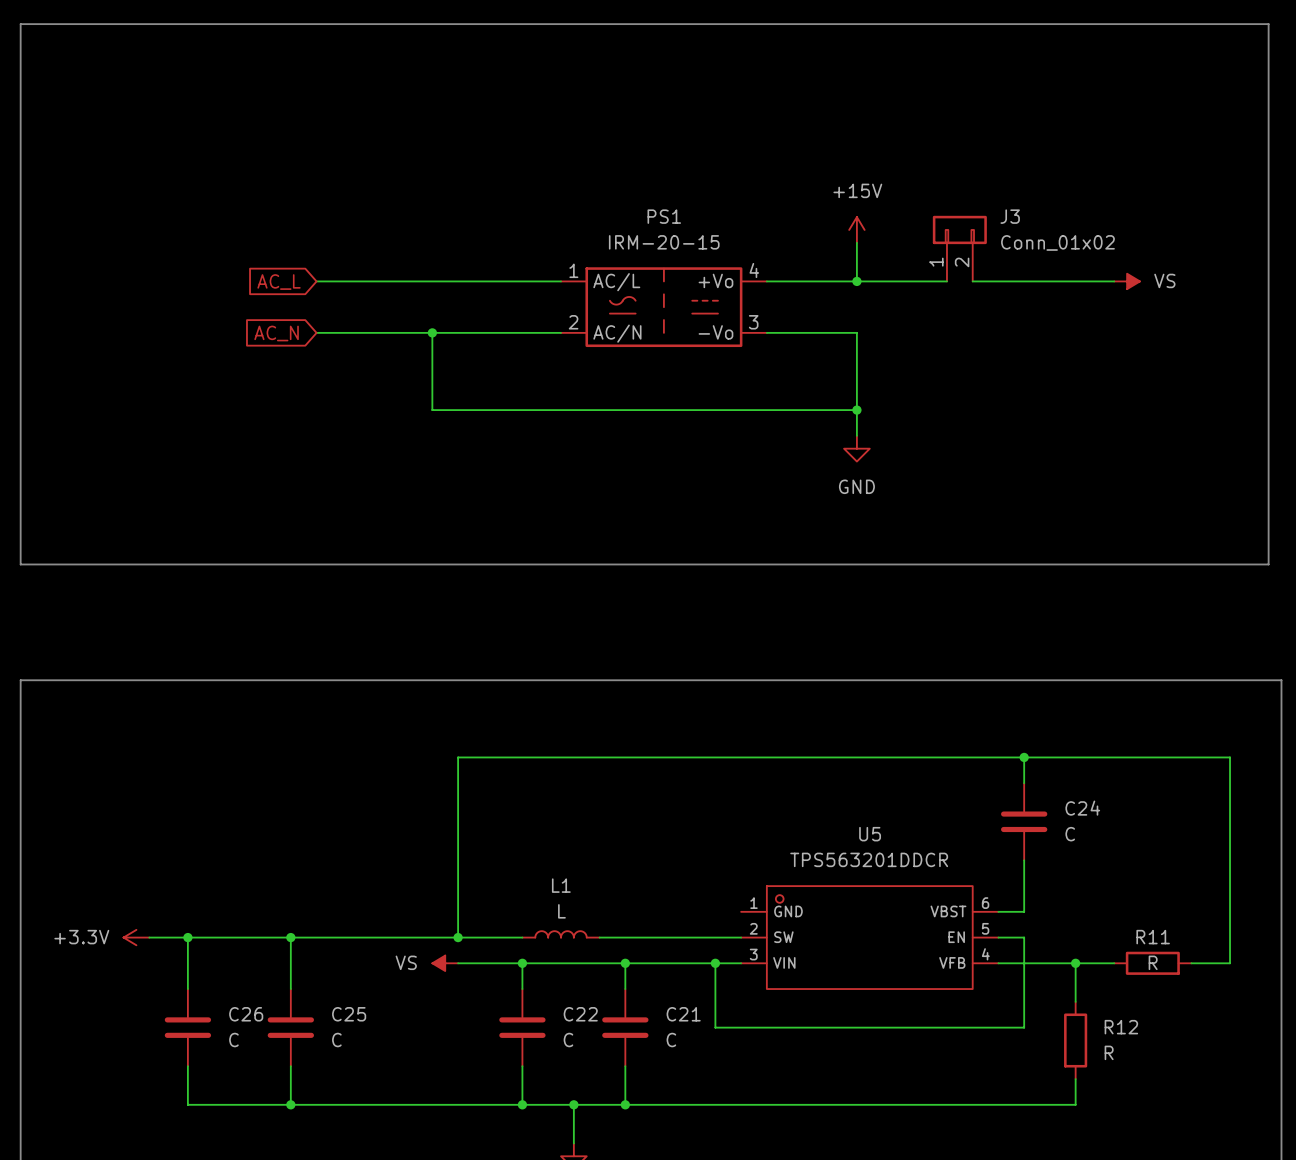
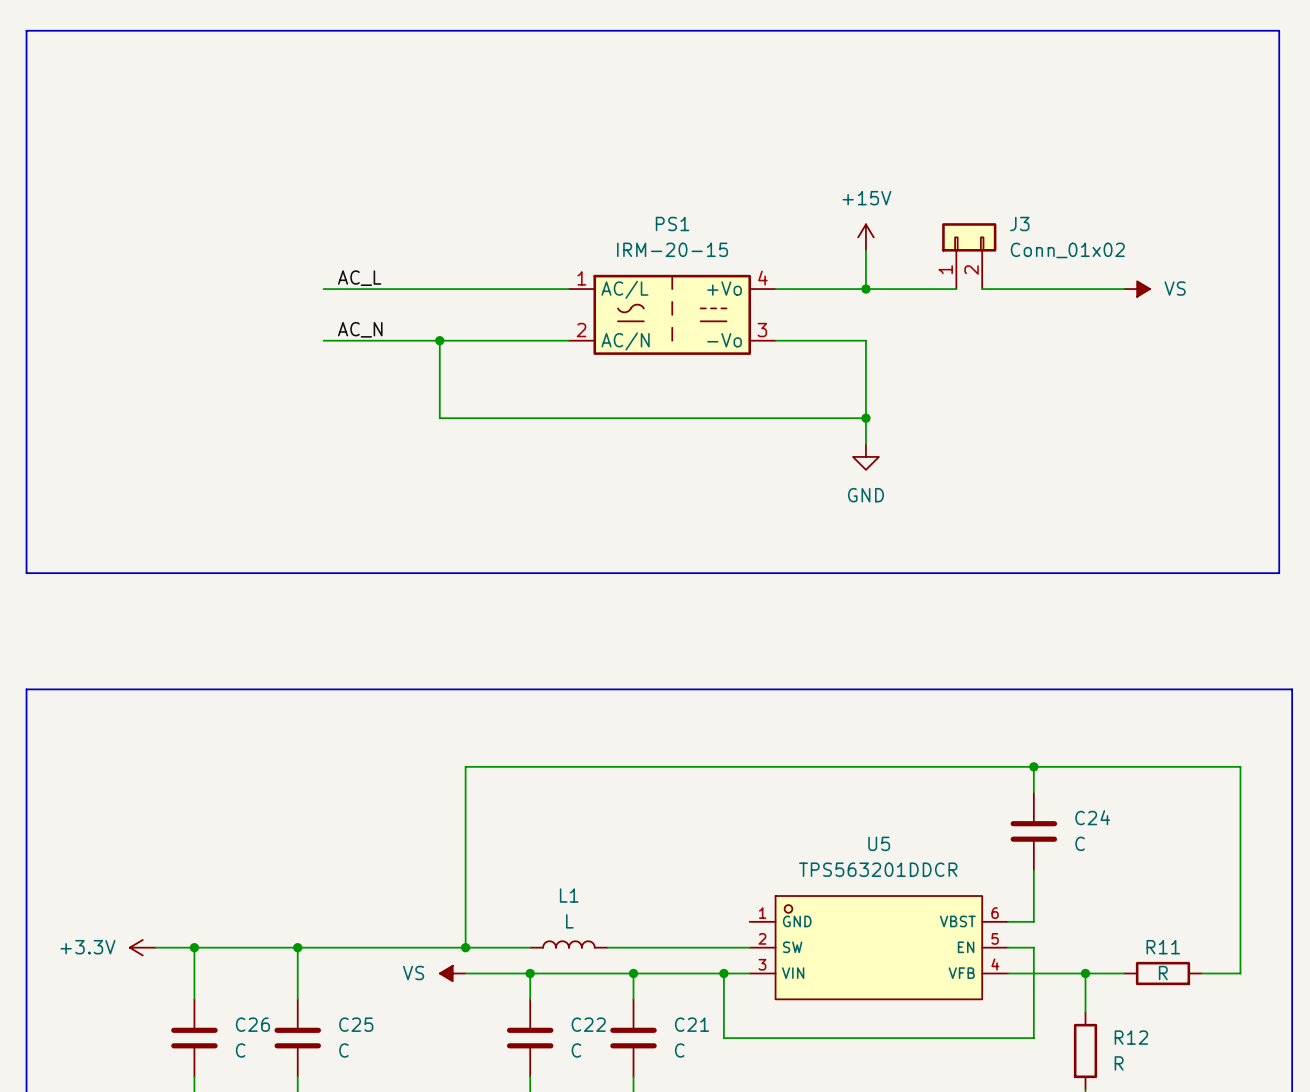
label: none -> AC_L (359, 278)
global label: AC_L (279, 282) -> none
label: none -> AC_N (360, 329)
global label: AC_N (276, 333) -> none

